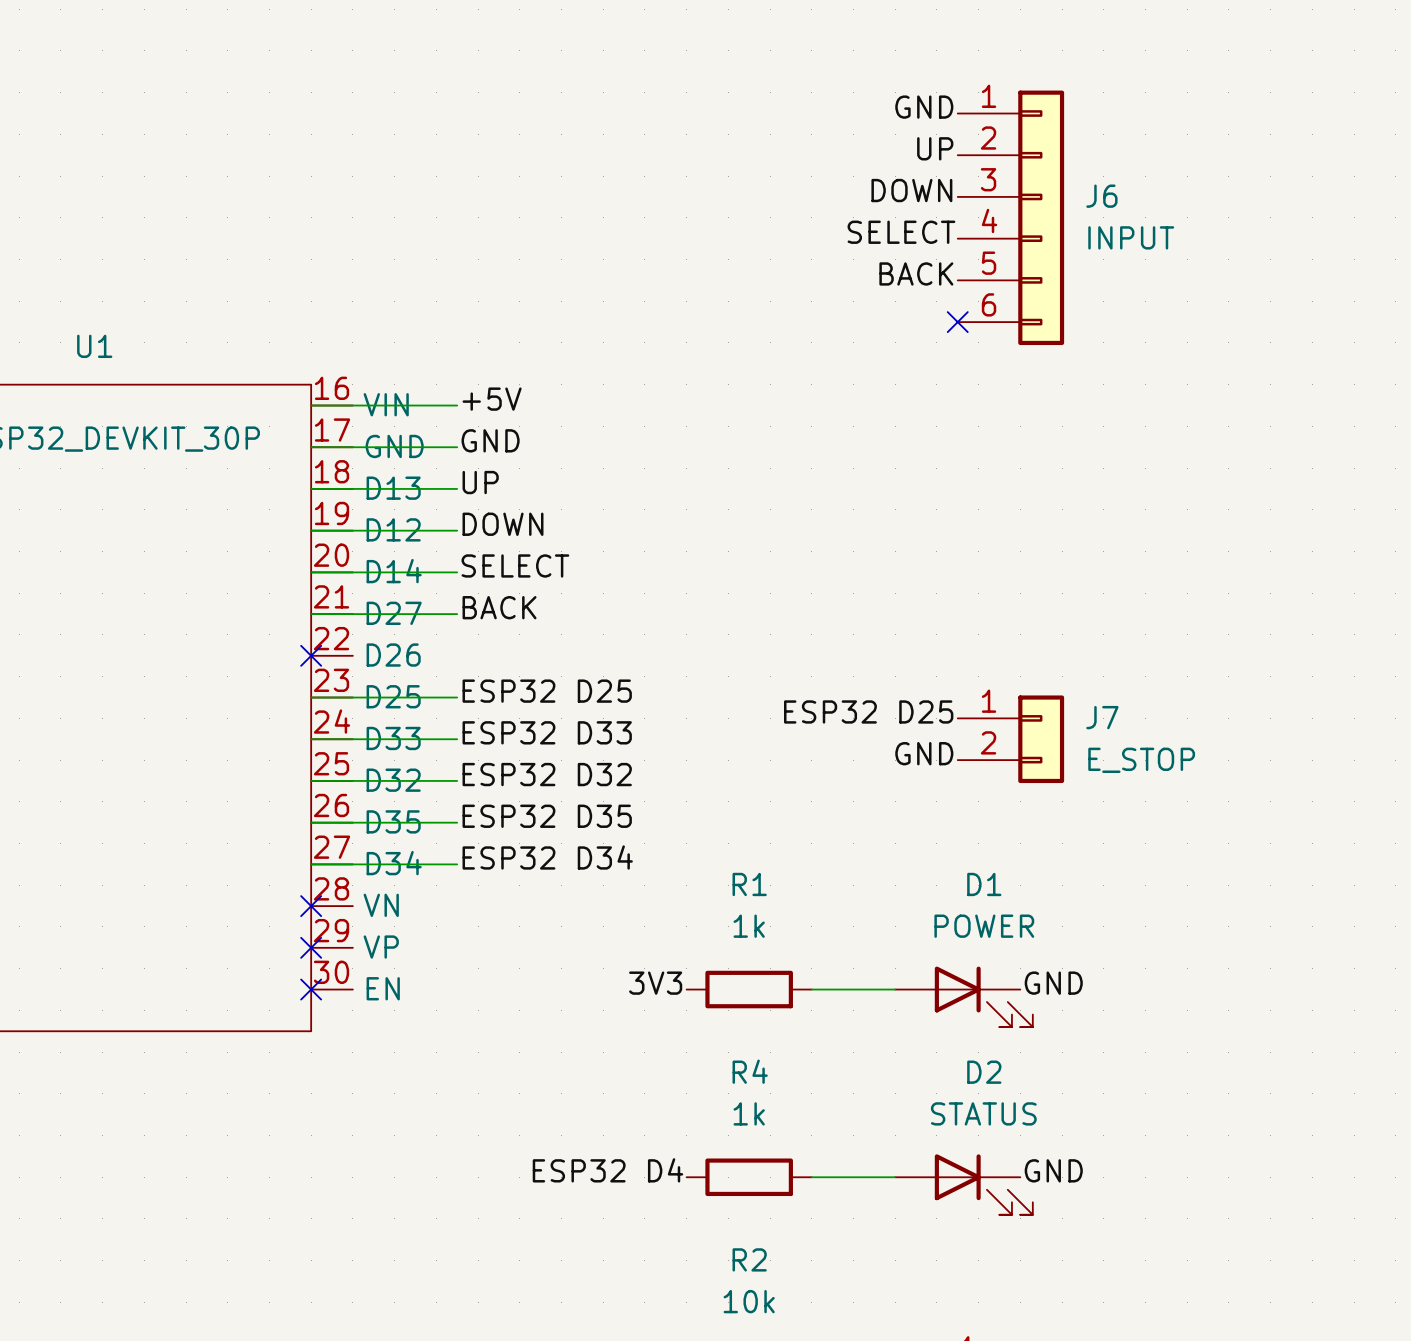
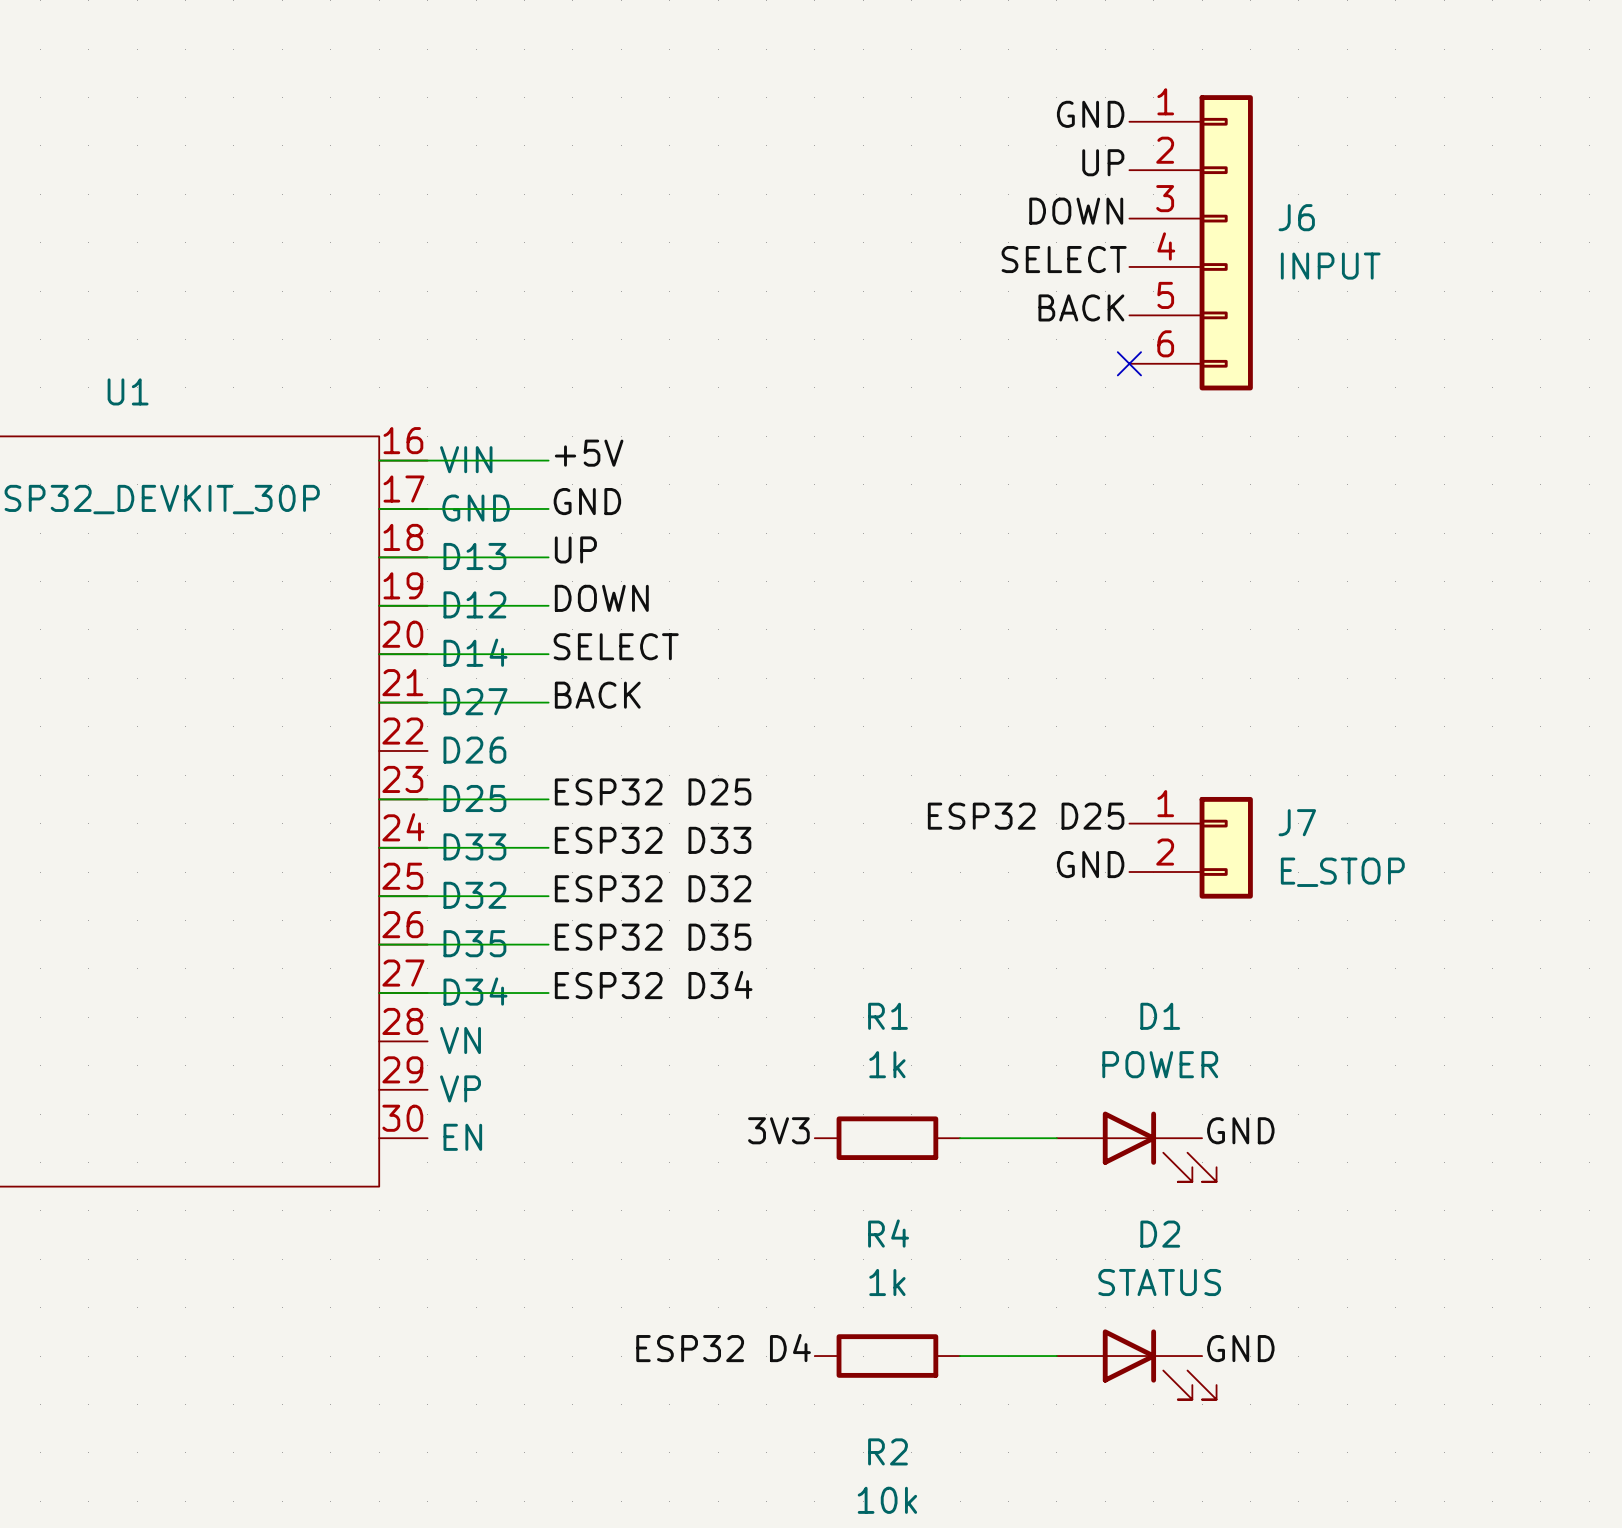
no-connect mark: (311, 655) -> none
no-connect mark: (311, 906) -> none
no-connect mark: (311, 947) -> none
no-connect mark: (311, 989) -> none

